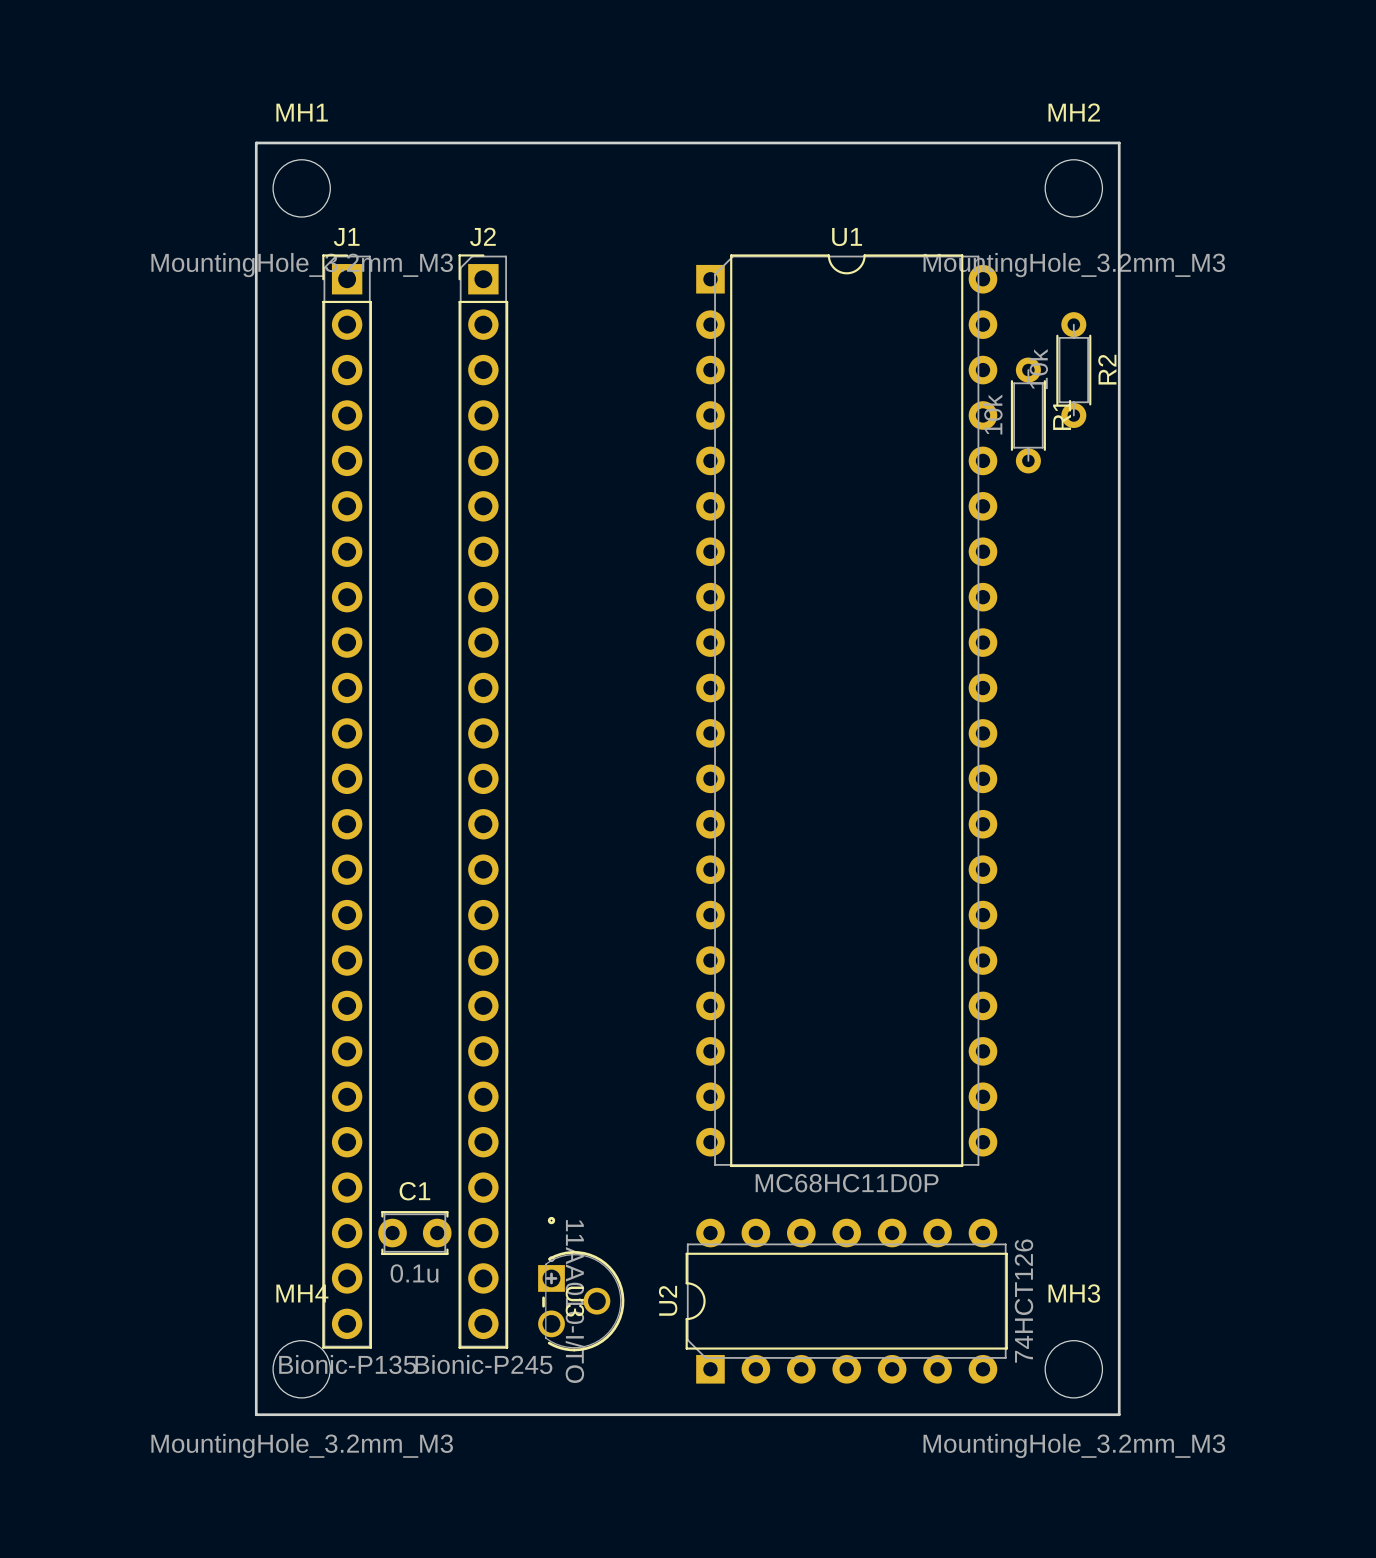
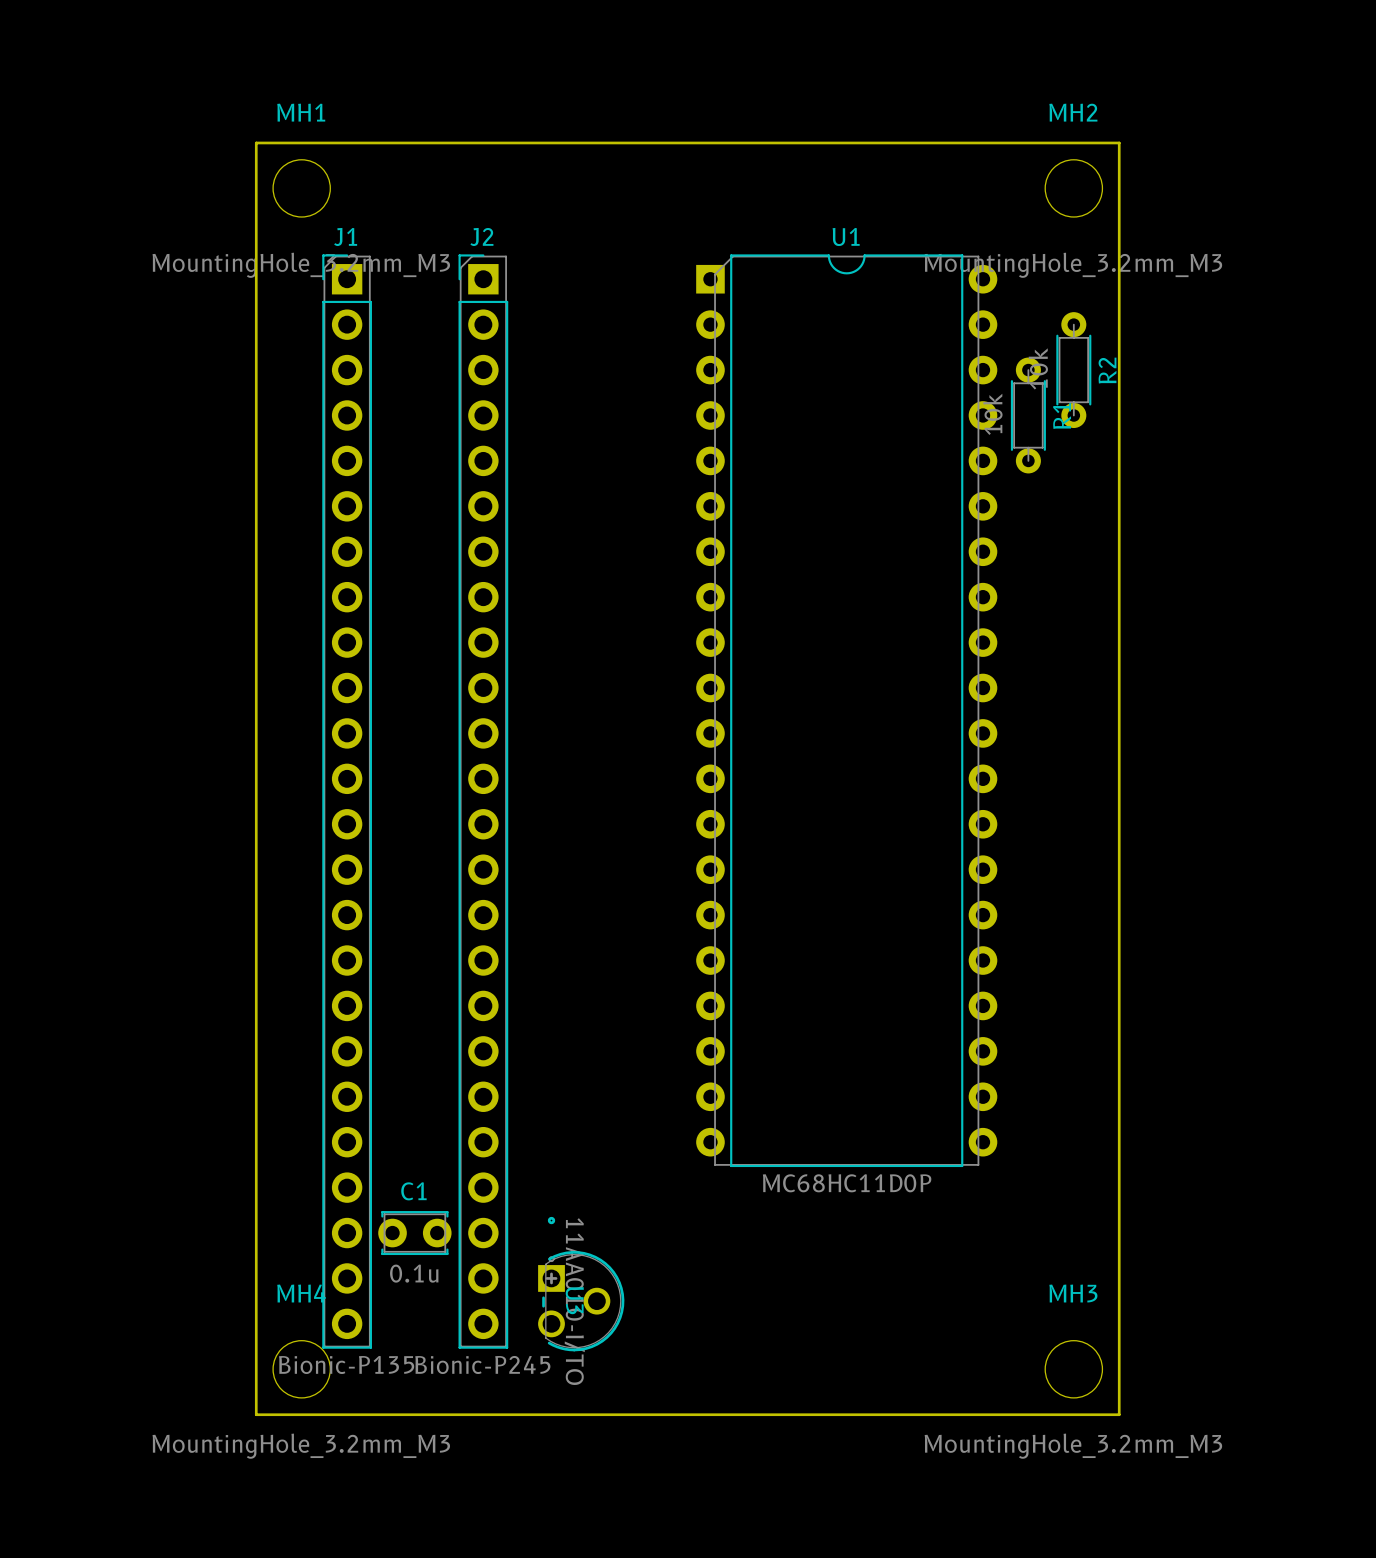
U2: 74HCT126 (846, 1301) -> none

